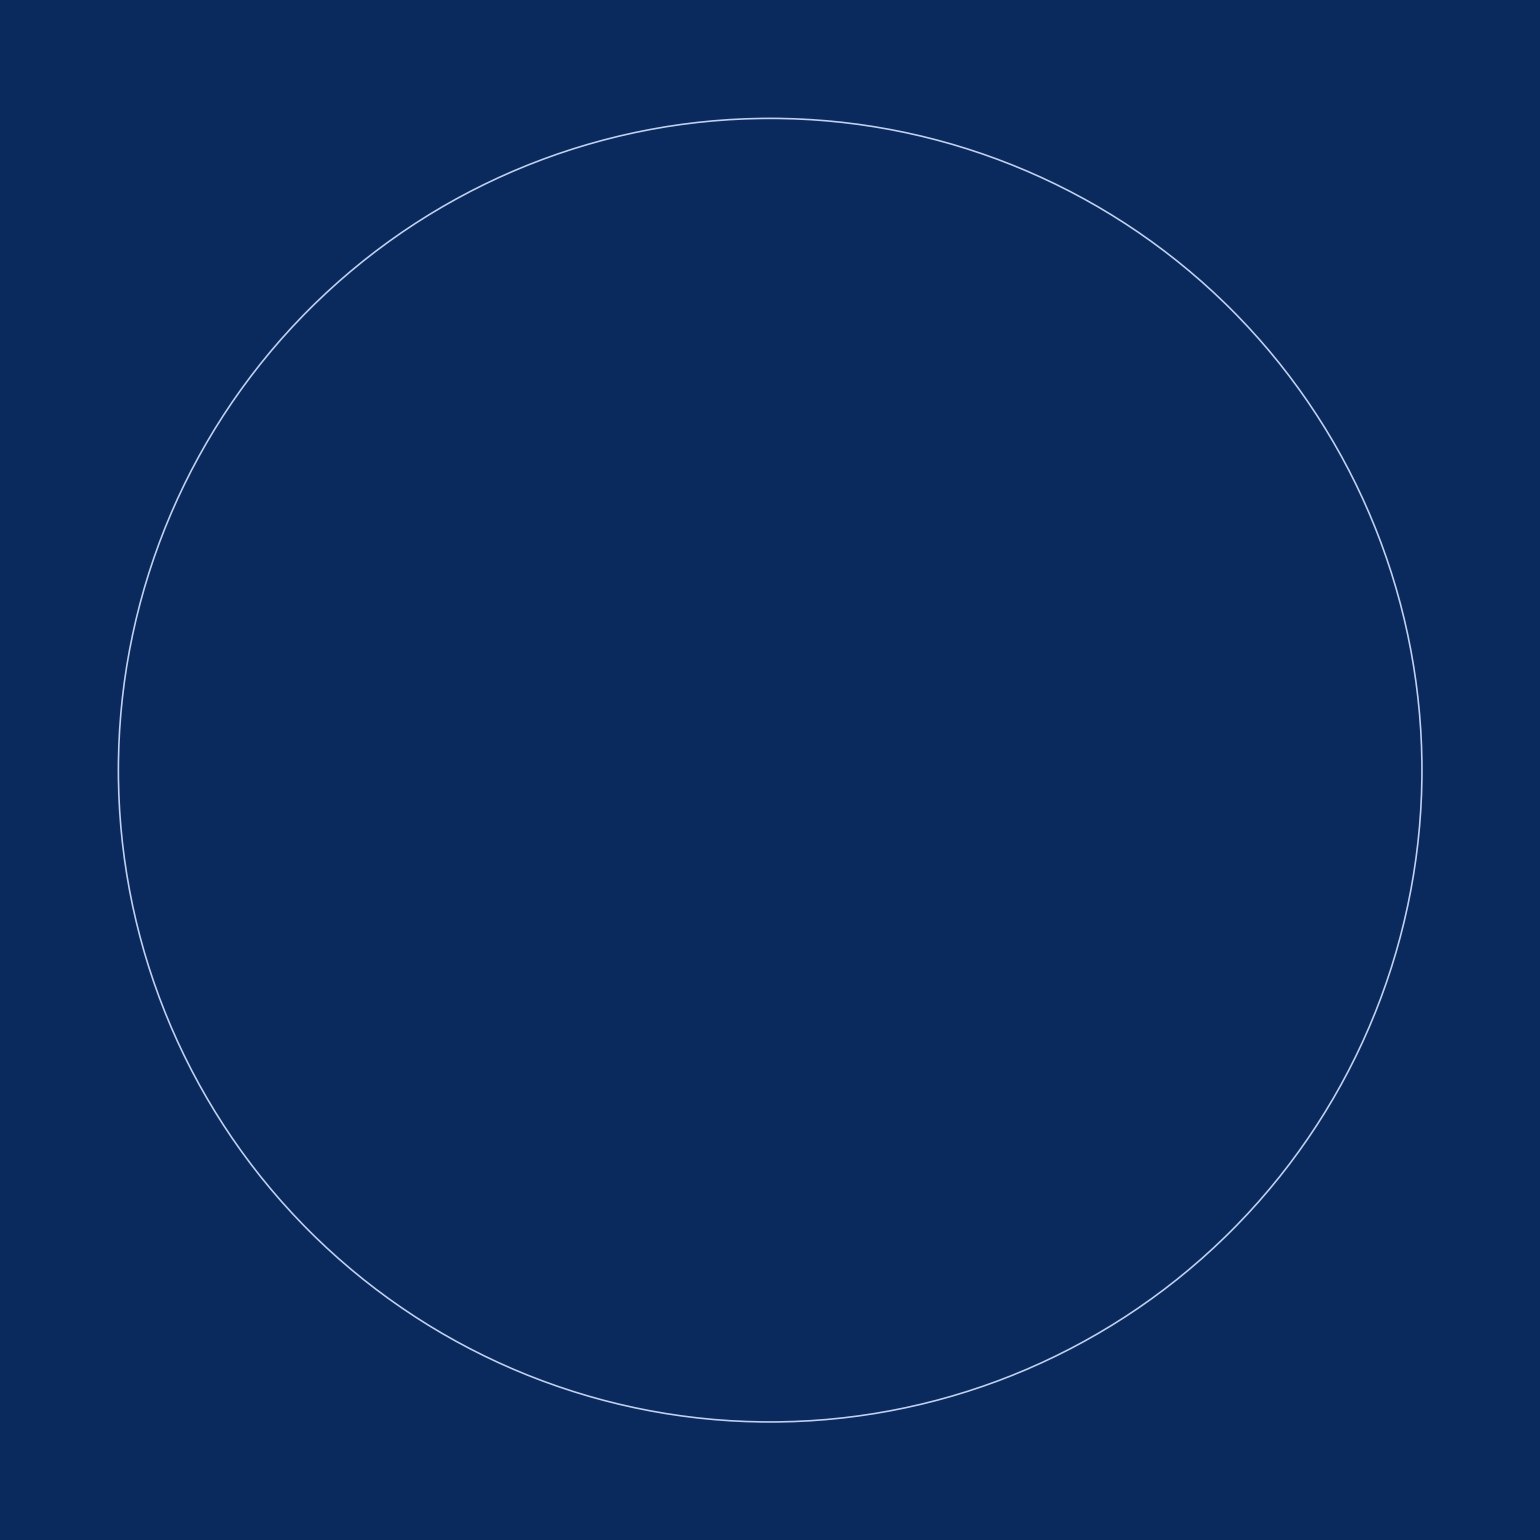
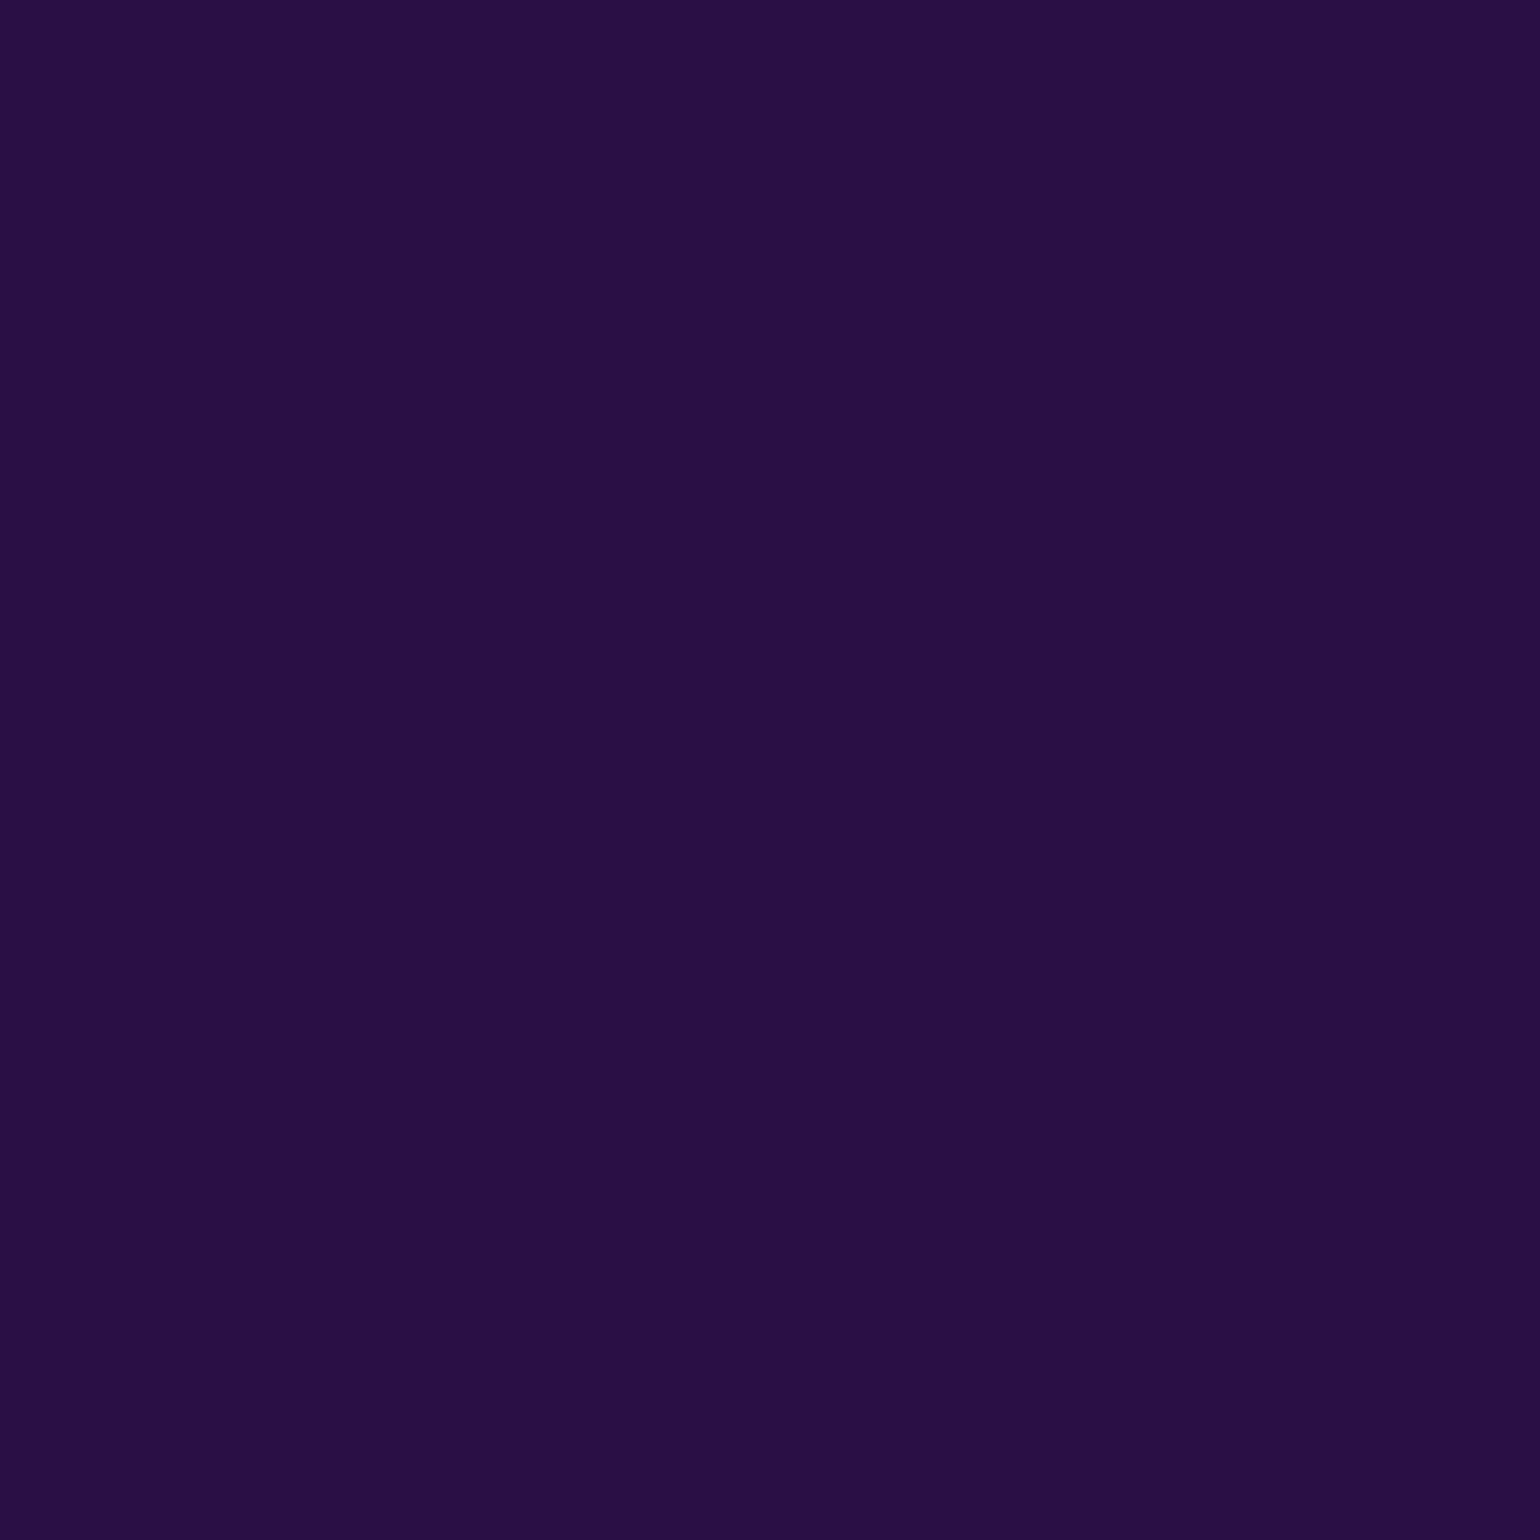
round board edge: [117, 117, 1423, 1423] -> none

